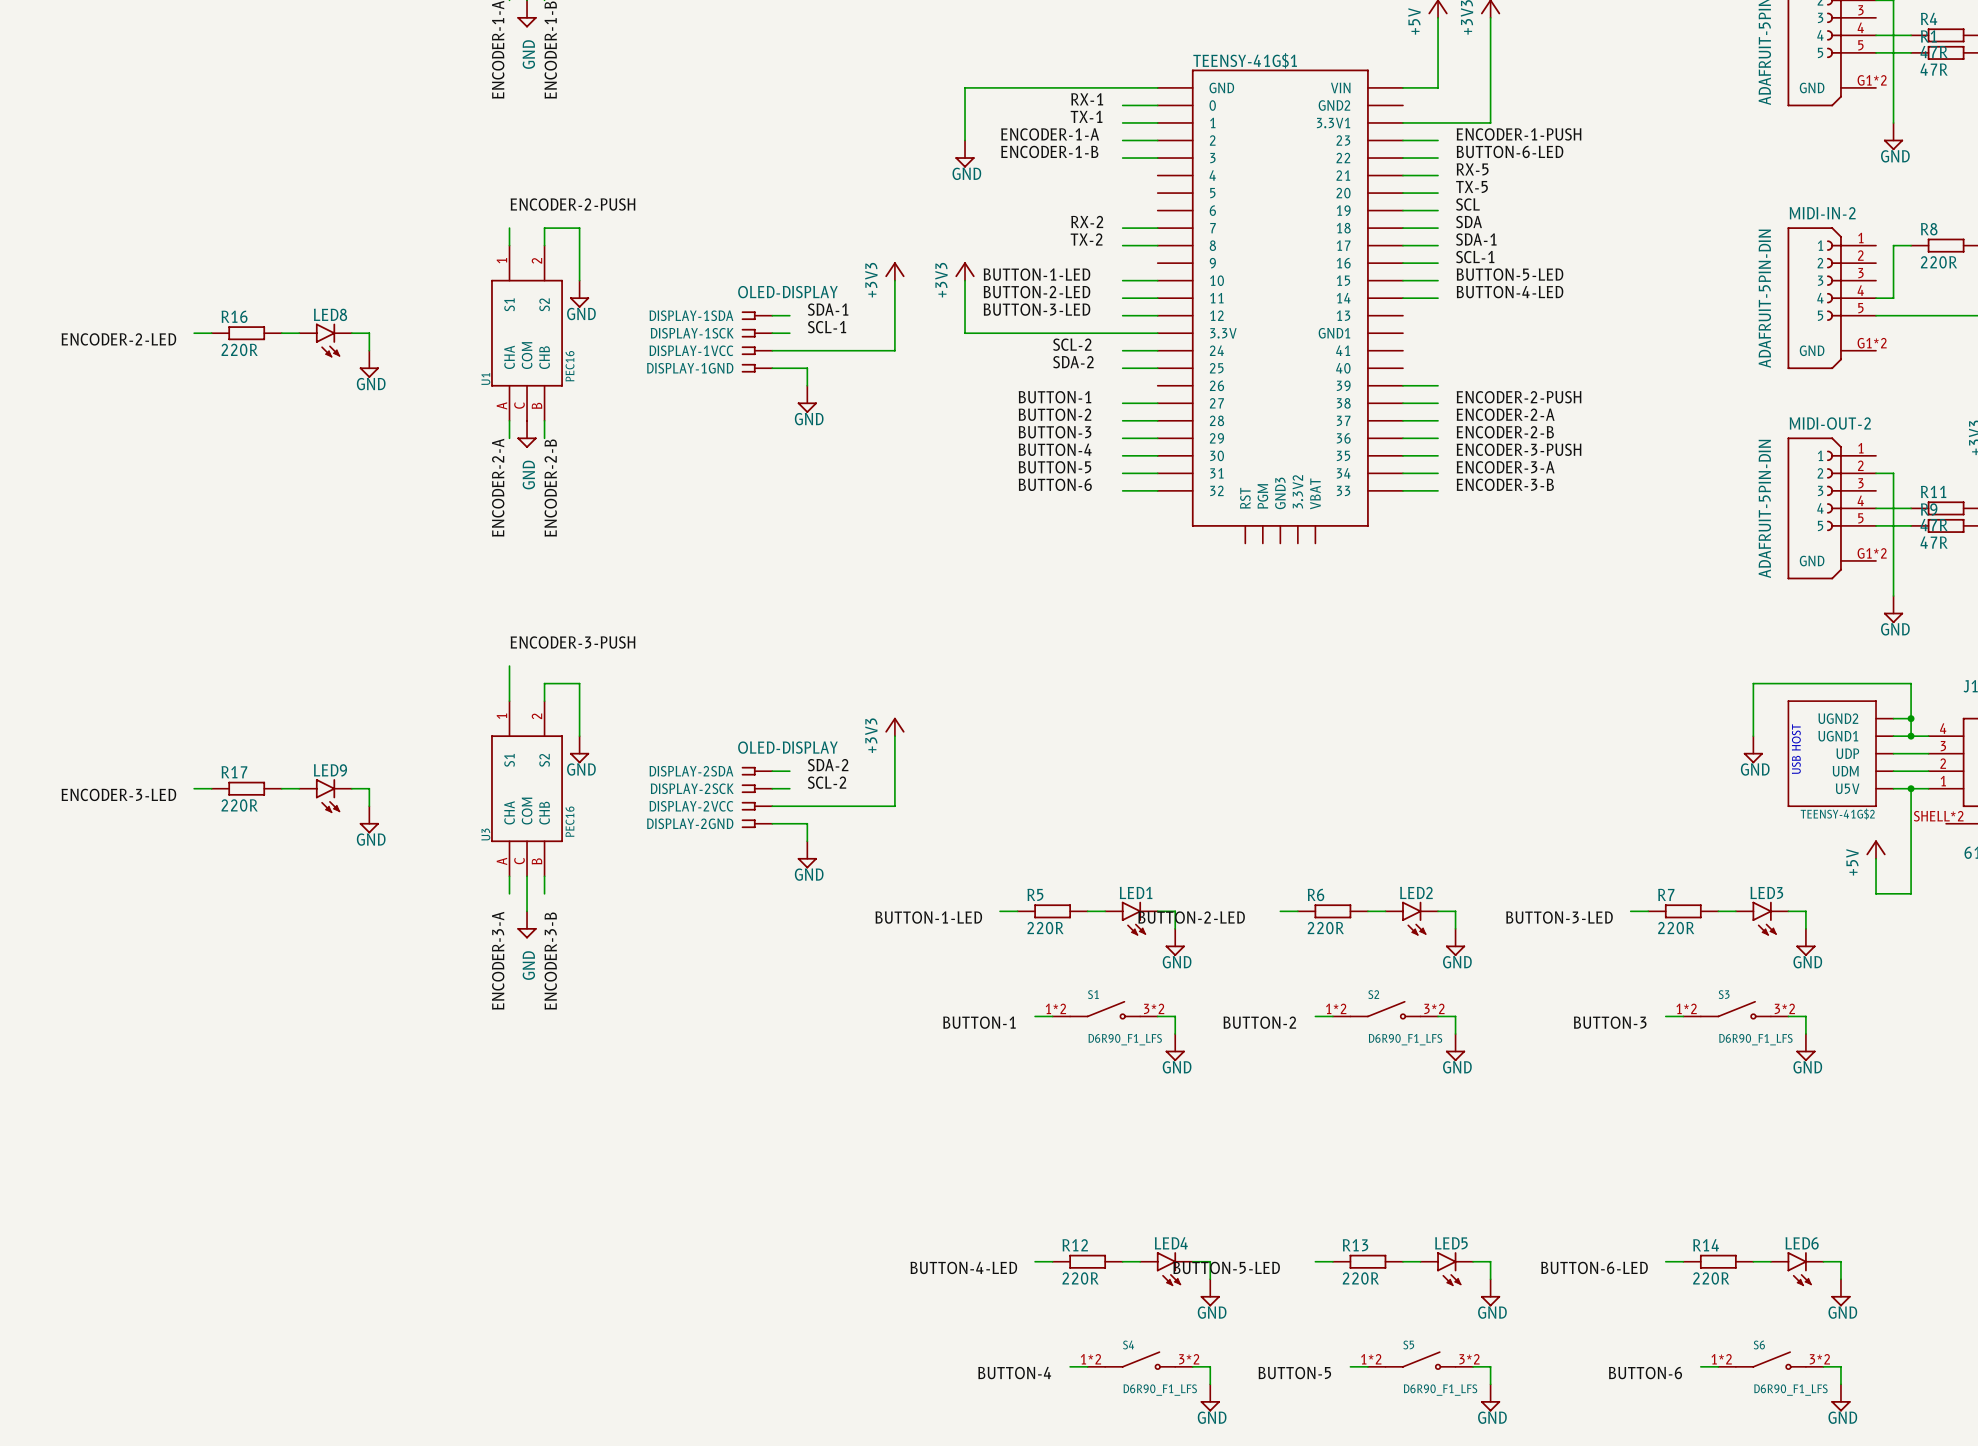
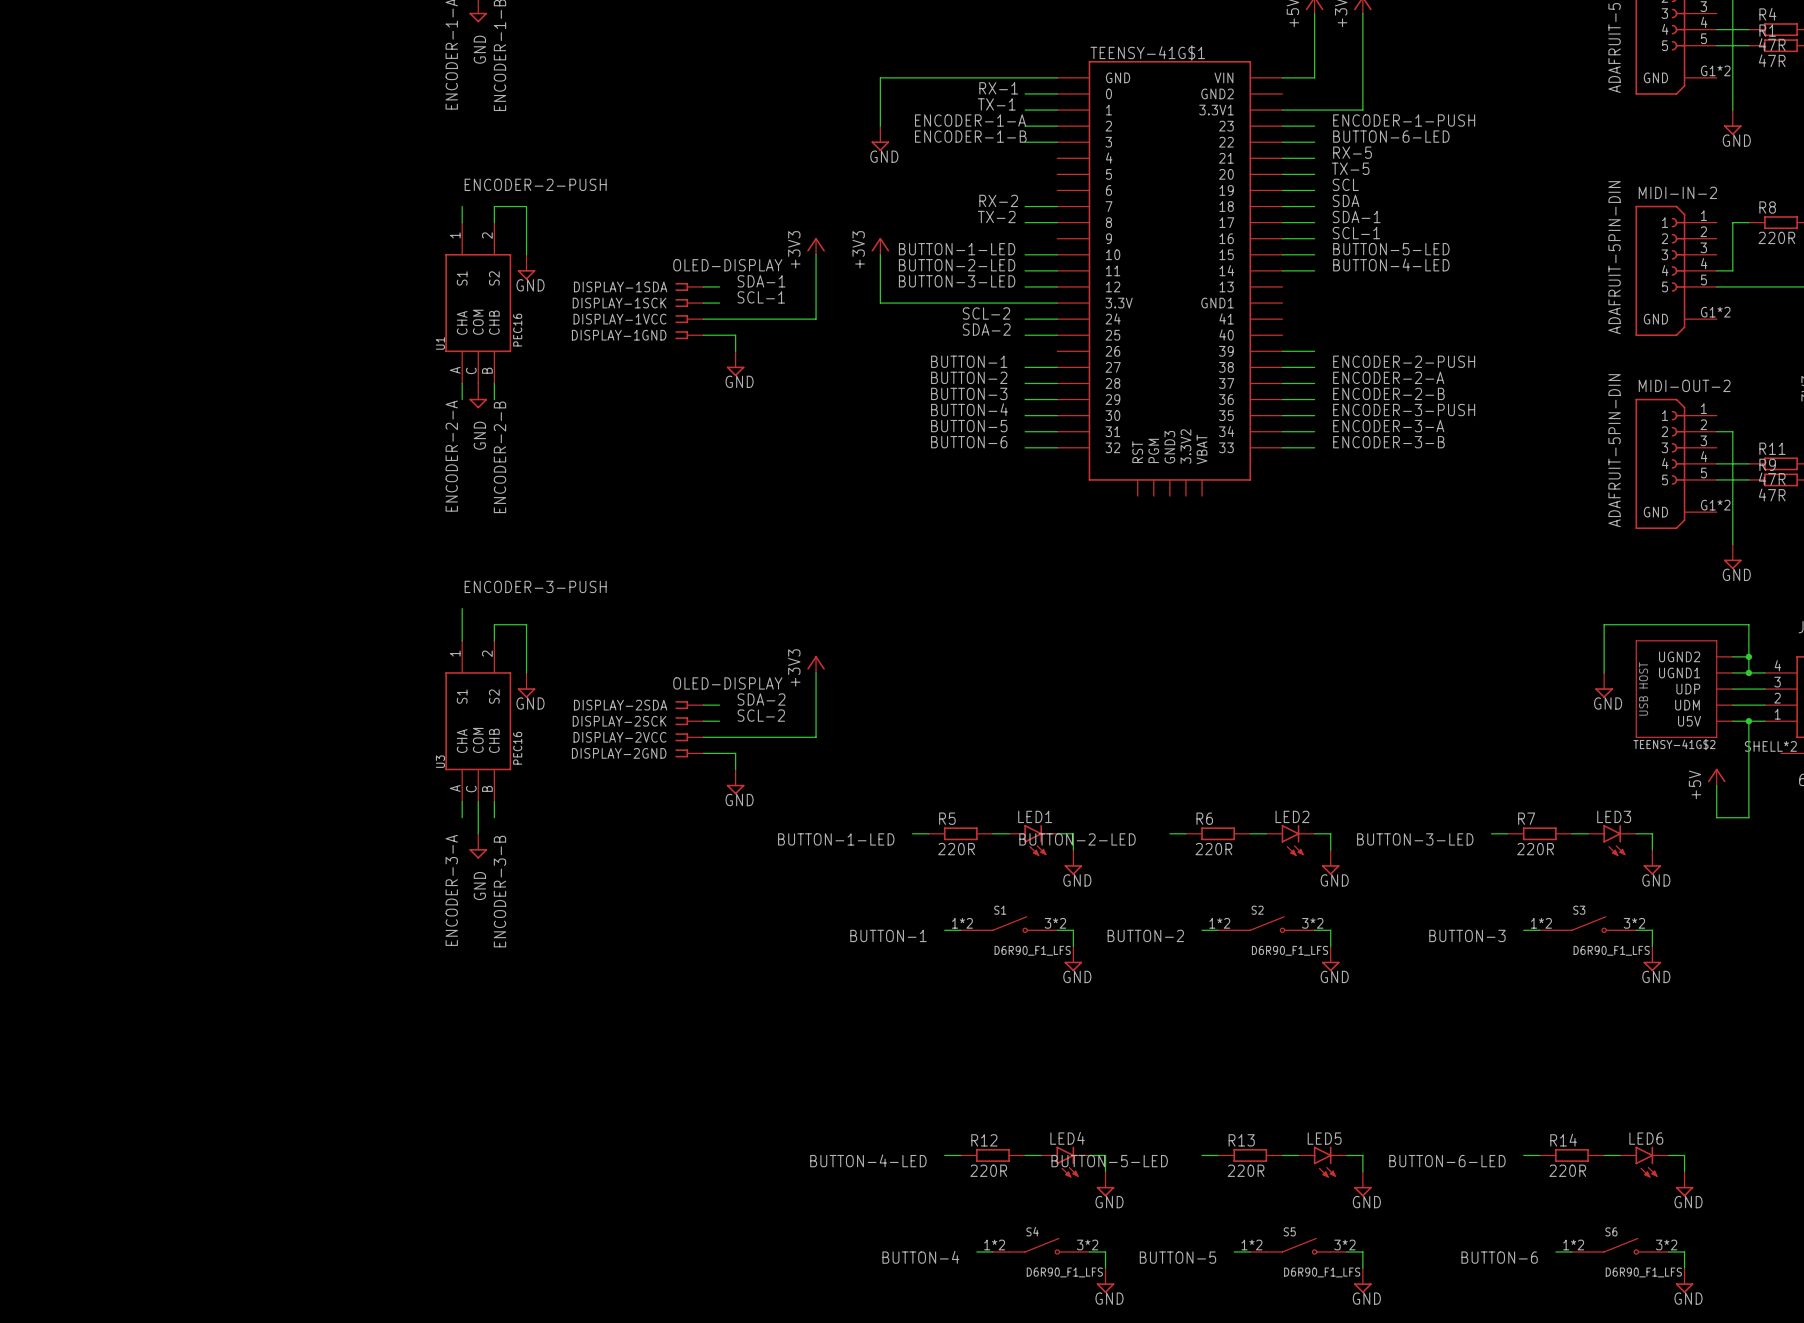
wire: (194, 333) (211, 333) -> none
R16: 220R (246, 333) -> none
wire: (281, 333) (299, 333) -> none
wire: (351, 333) (369, 333) (369, 350) -> none
label: ENCODER-2-LED (118, 339) -> none
LED8: (325, 340) -> none
power symbol: GND (369, 364) -> none
wire: (194, 788) (211, 788) -> none
R17: 220R (246, 788) -> none
wire: (281, 788) (299, 788) -> none
wire: (351, 788) (369, 788) (369, 806) -> none
label: ENCODER-3-LED (118, 794) -> none
LED9: (325, 795) -> none
power symbol: GND (369, 819) -> none

